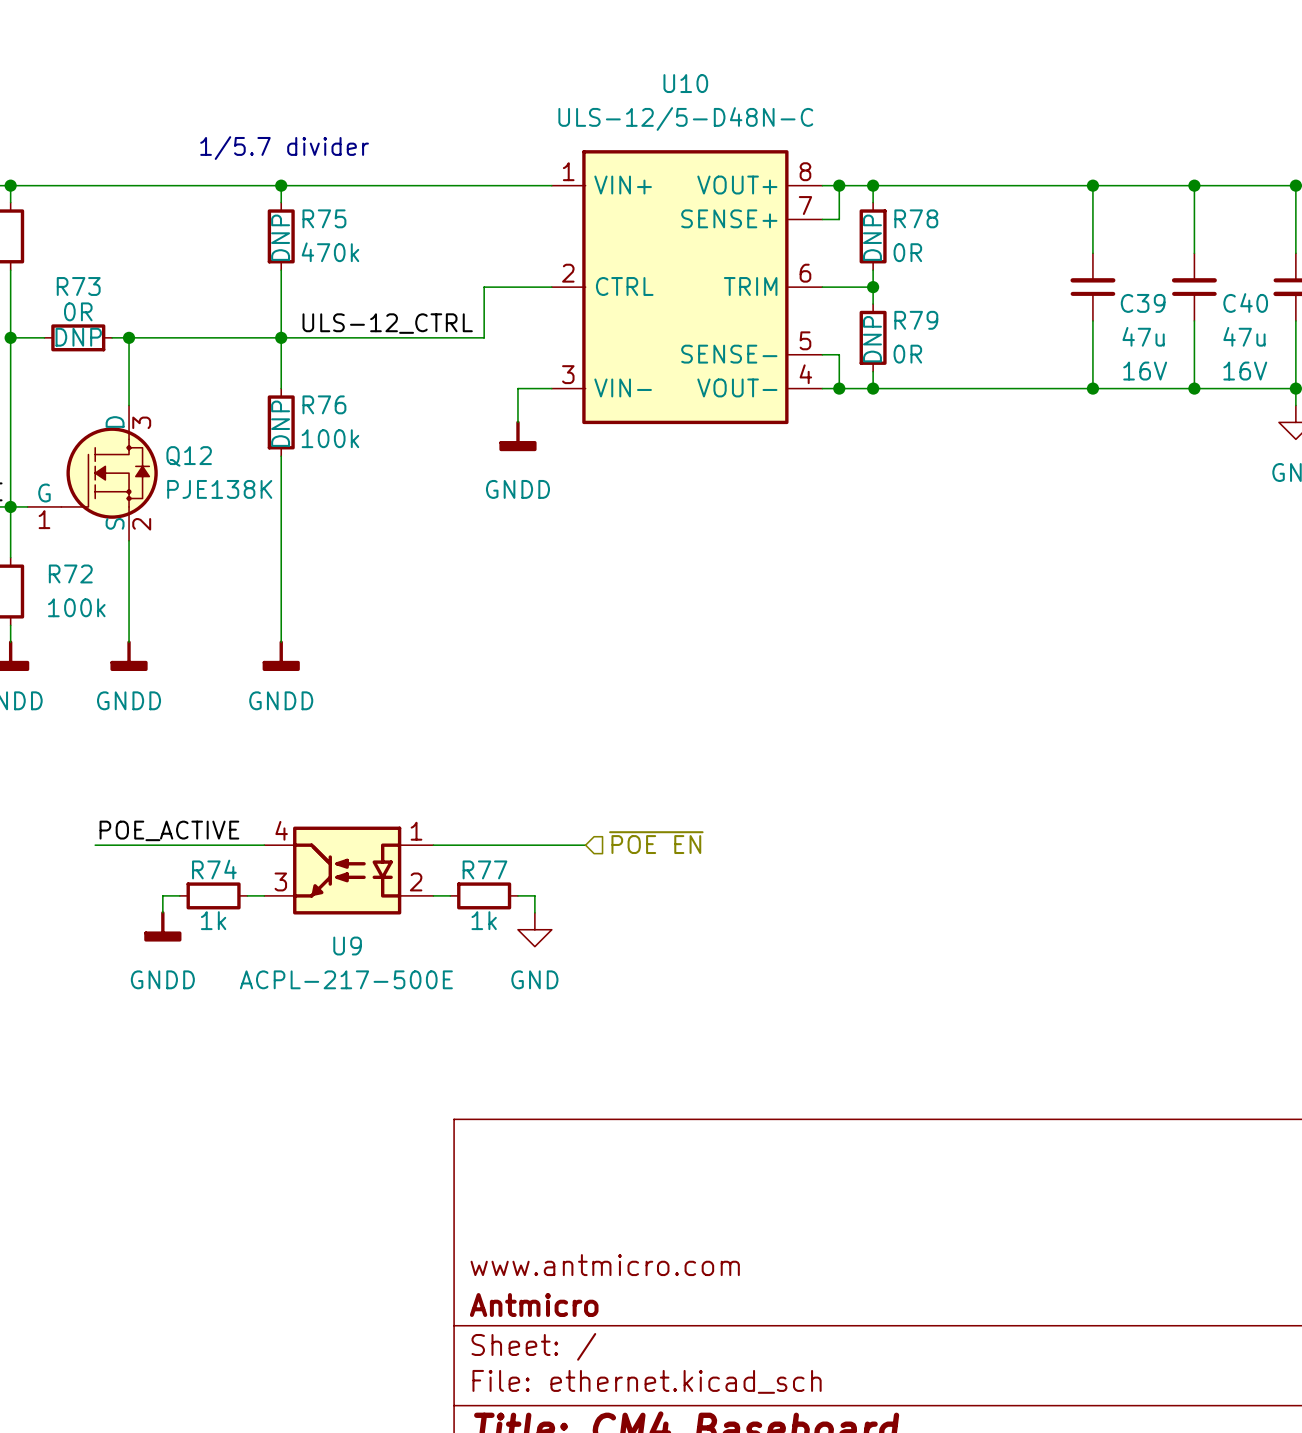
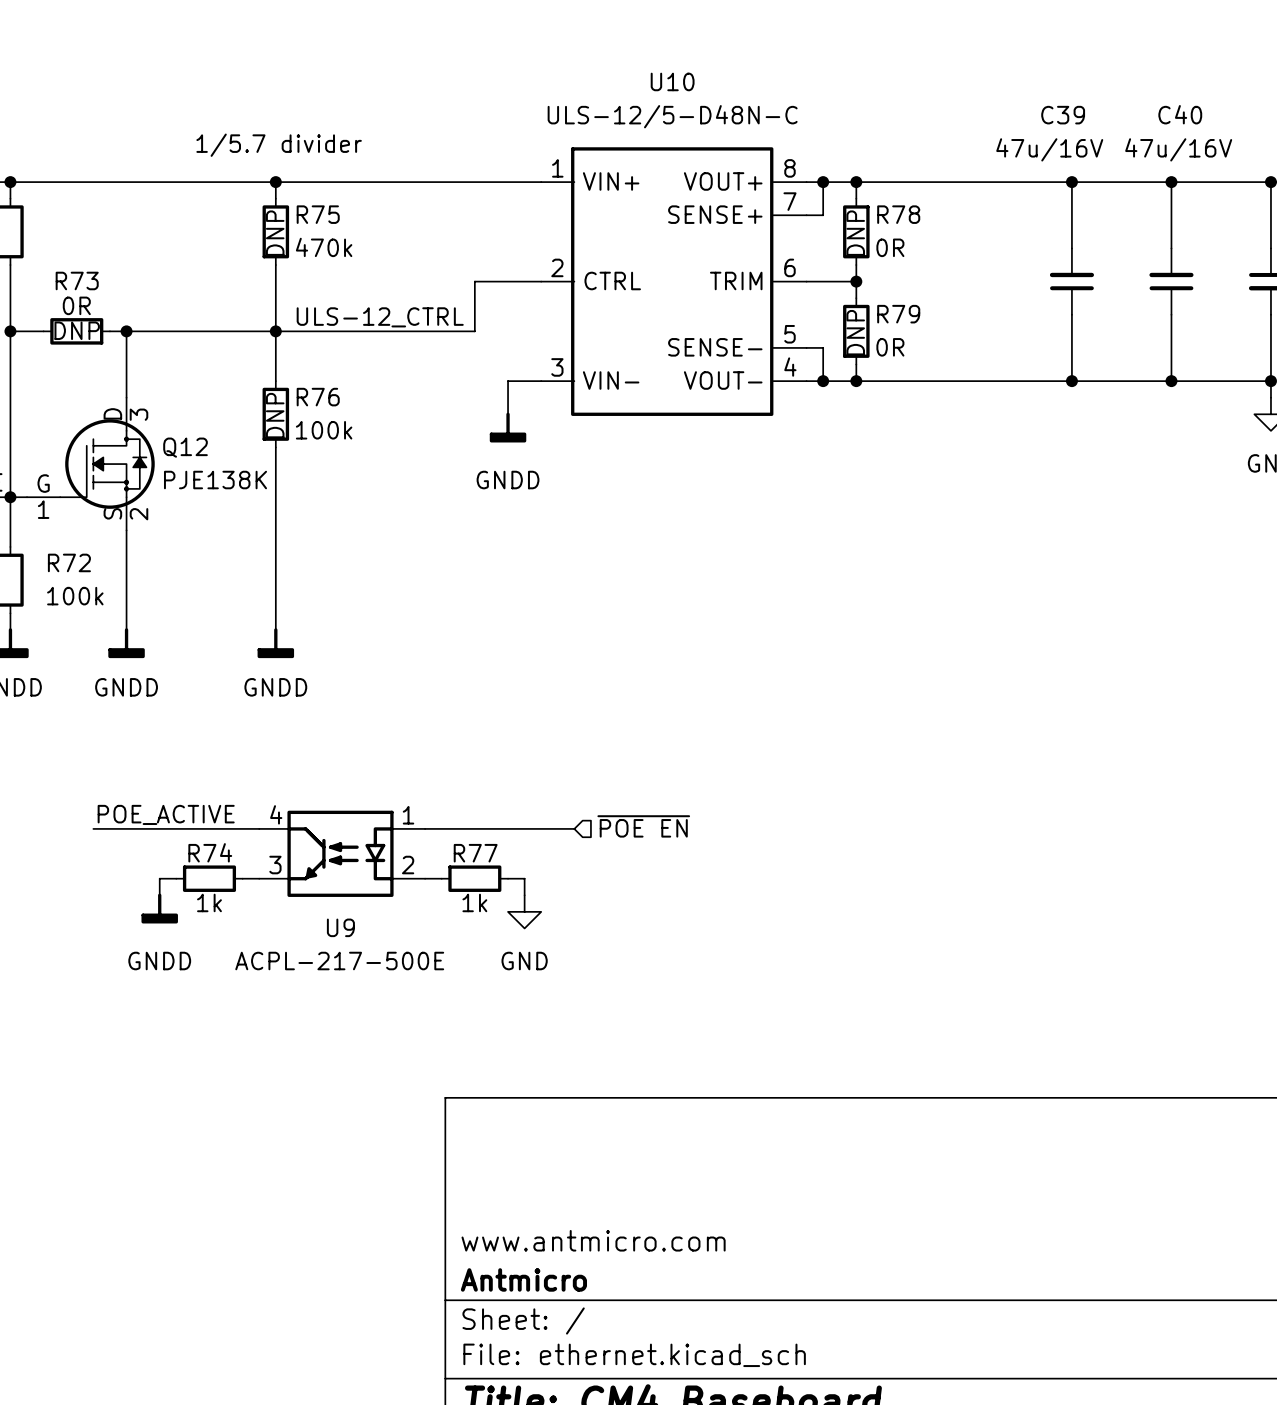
C39 name position: C39 (1143, 303) -> C39 (1063, 115)
C40 name position: C40 (1245, 303) -> C40 (1180, 114)
C39 text: 47u (1143, 336) -> 47u/16V (1049, 149)
C40 text: 47u (1244, 336) -> 47u/16V (1178, 149)
C39 text: 16V (1145, 371) -> none
C40 text: 16V (1245, 371) -> none

